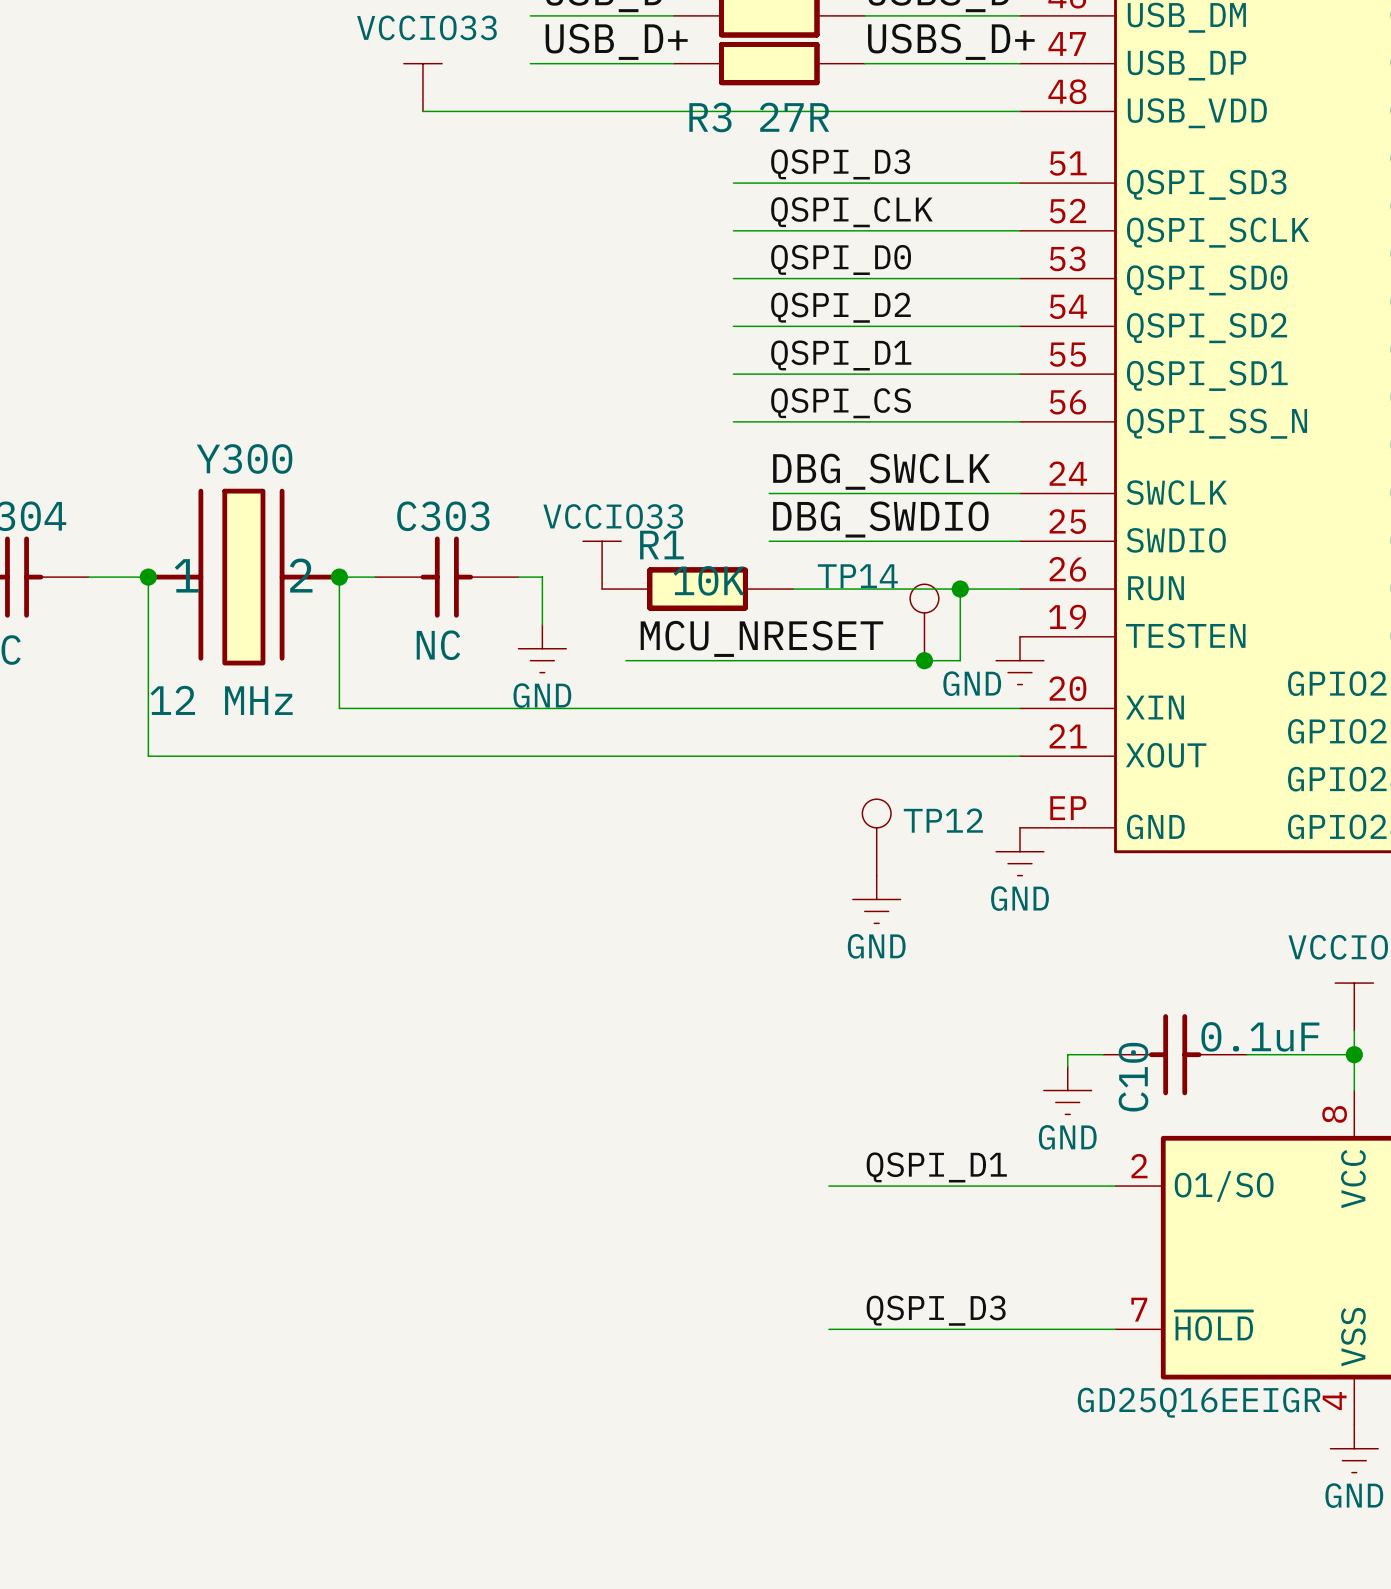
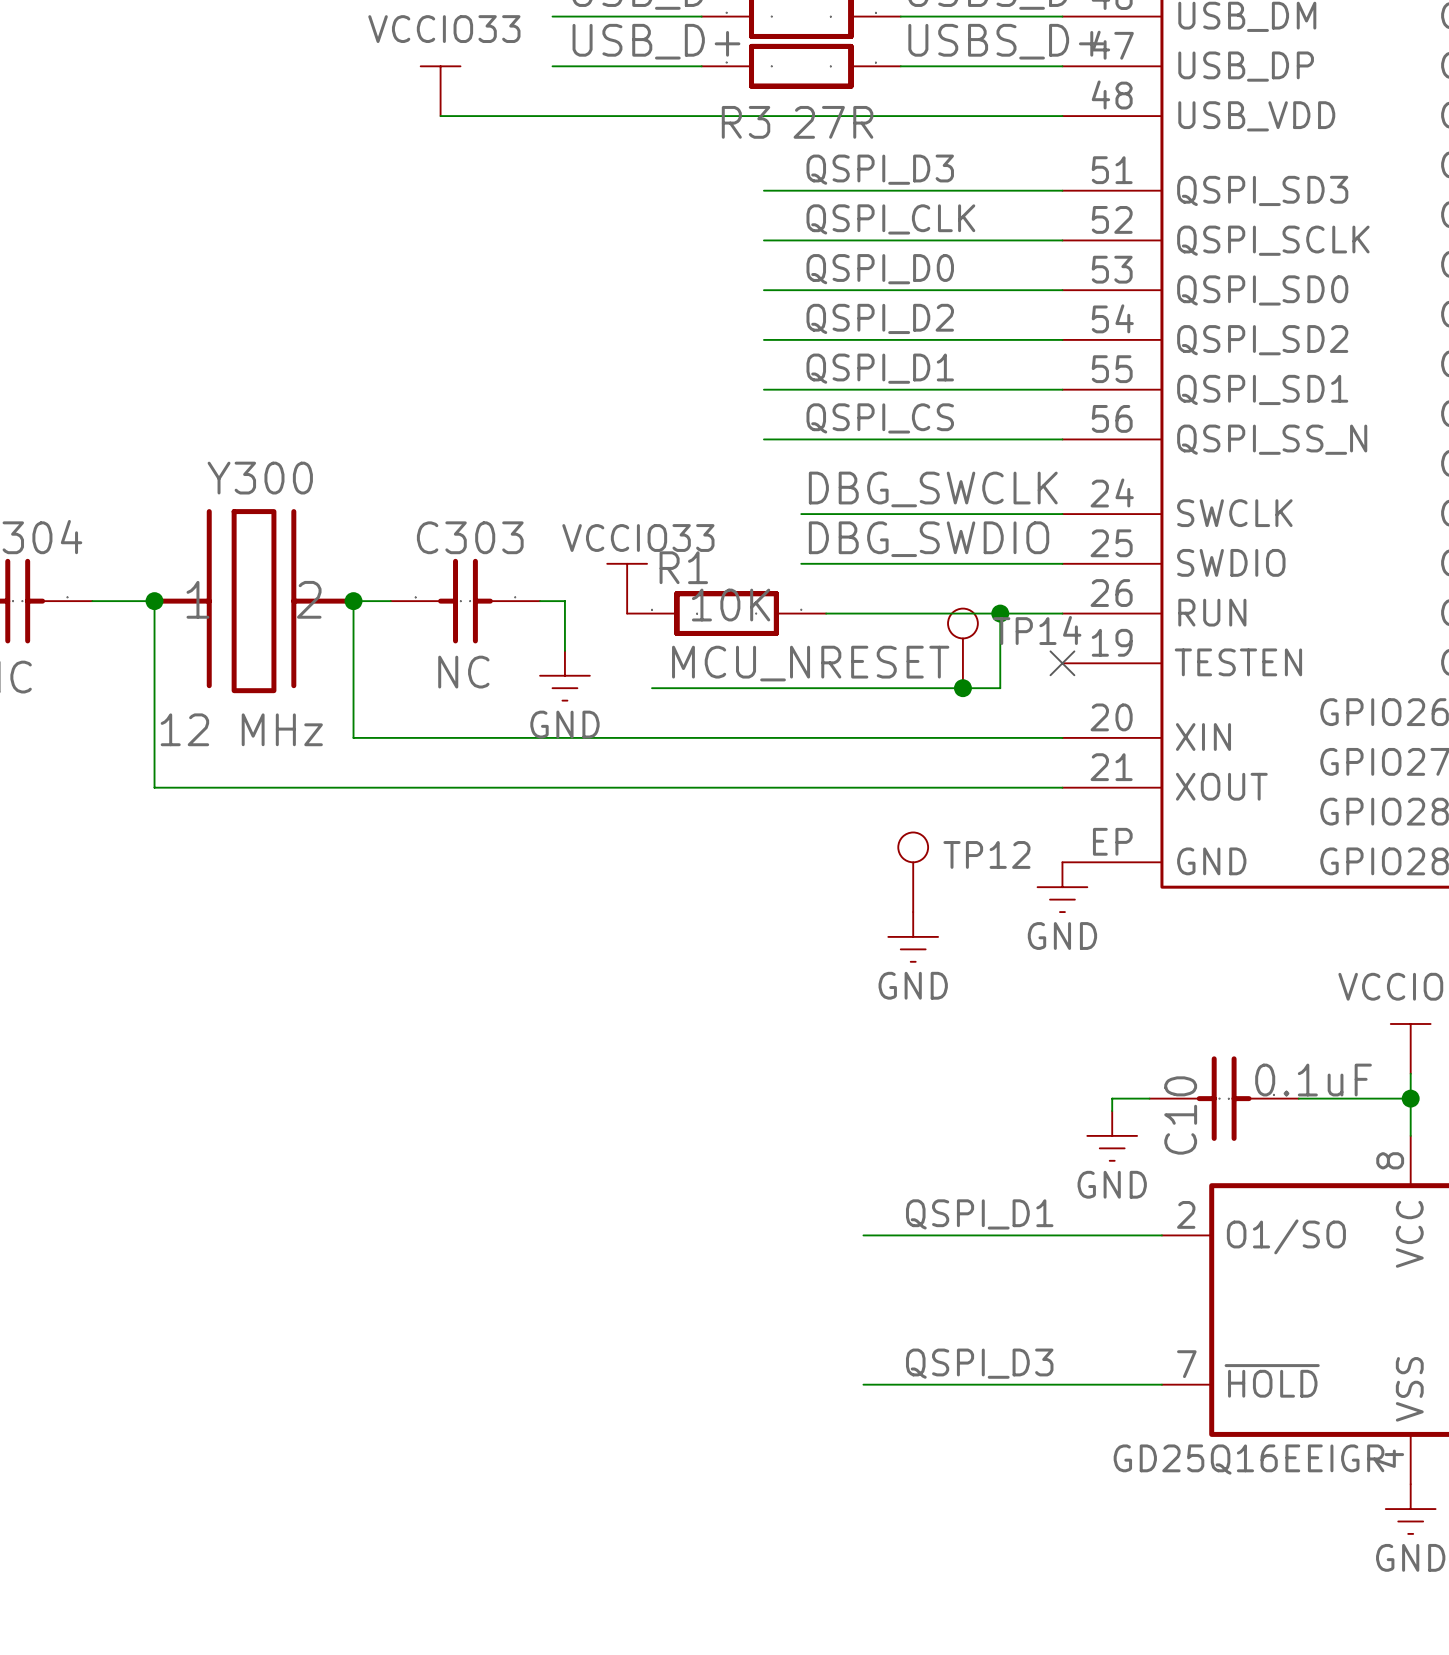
TP14 name position: TP14 (857, 576) -> TP14 (1037, 630)
no-connect mark: none -> (1062, 663)
power symbol: GND (1019, 660) -> none

